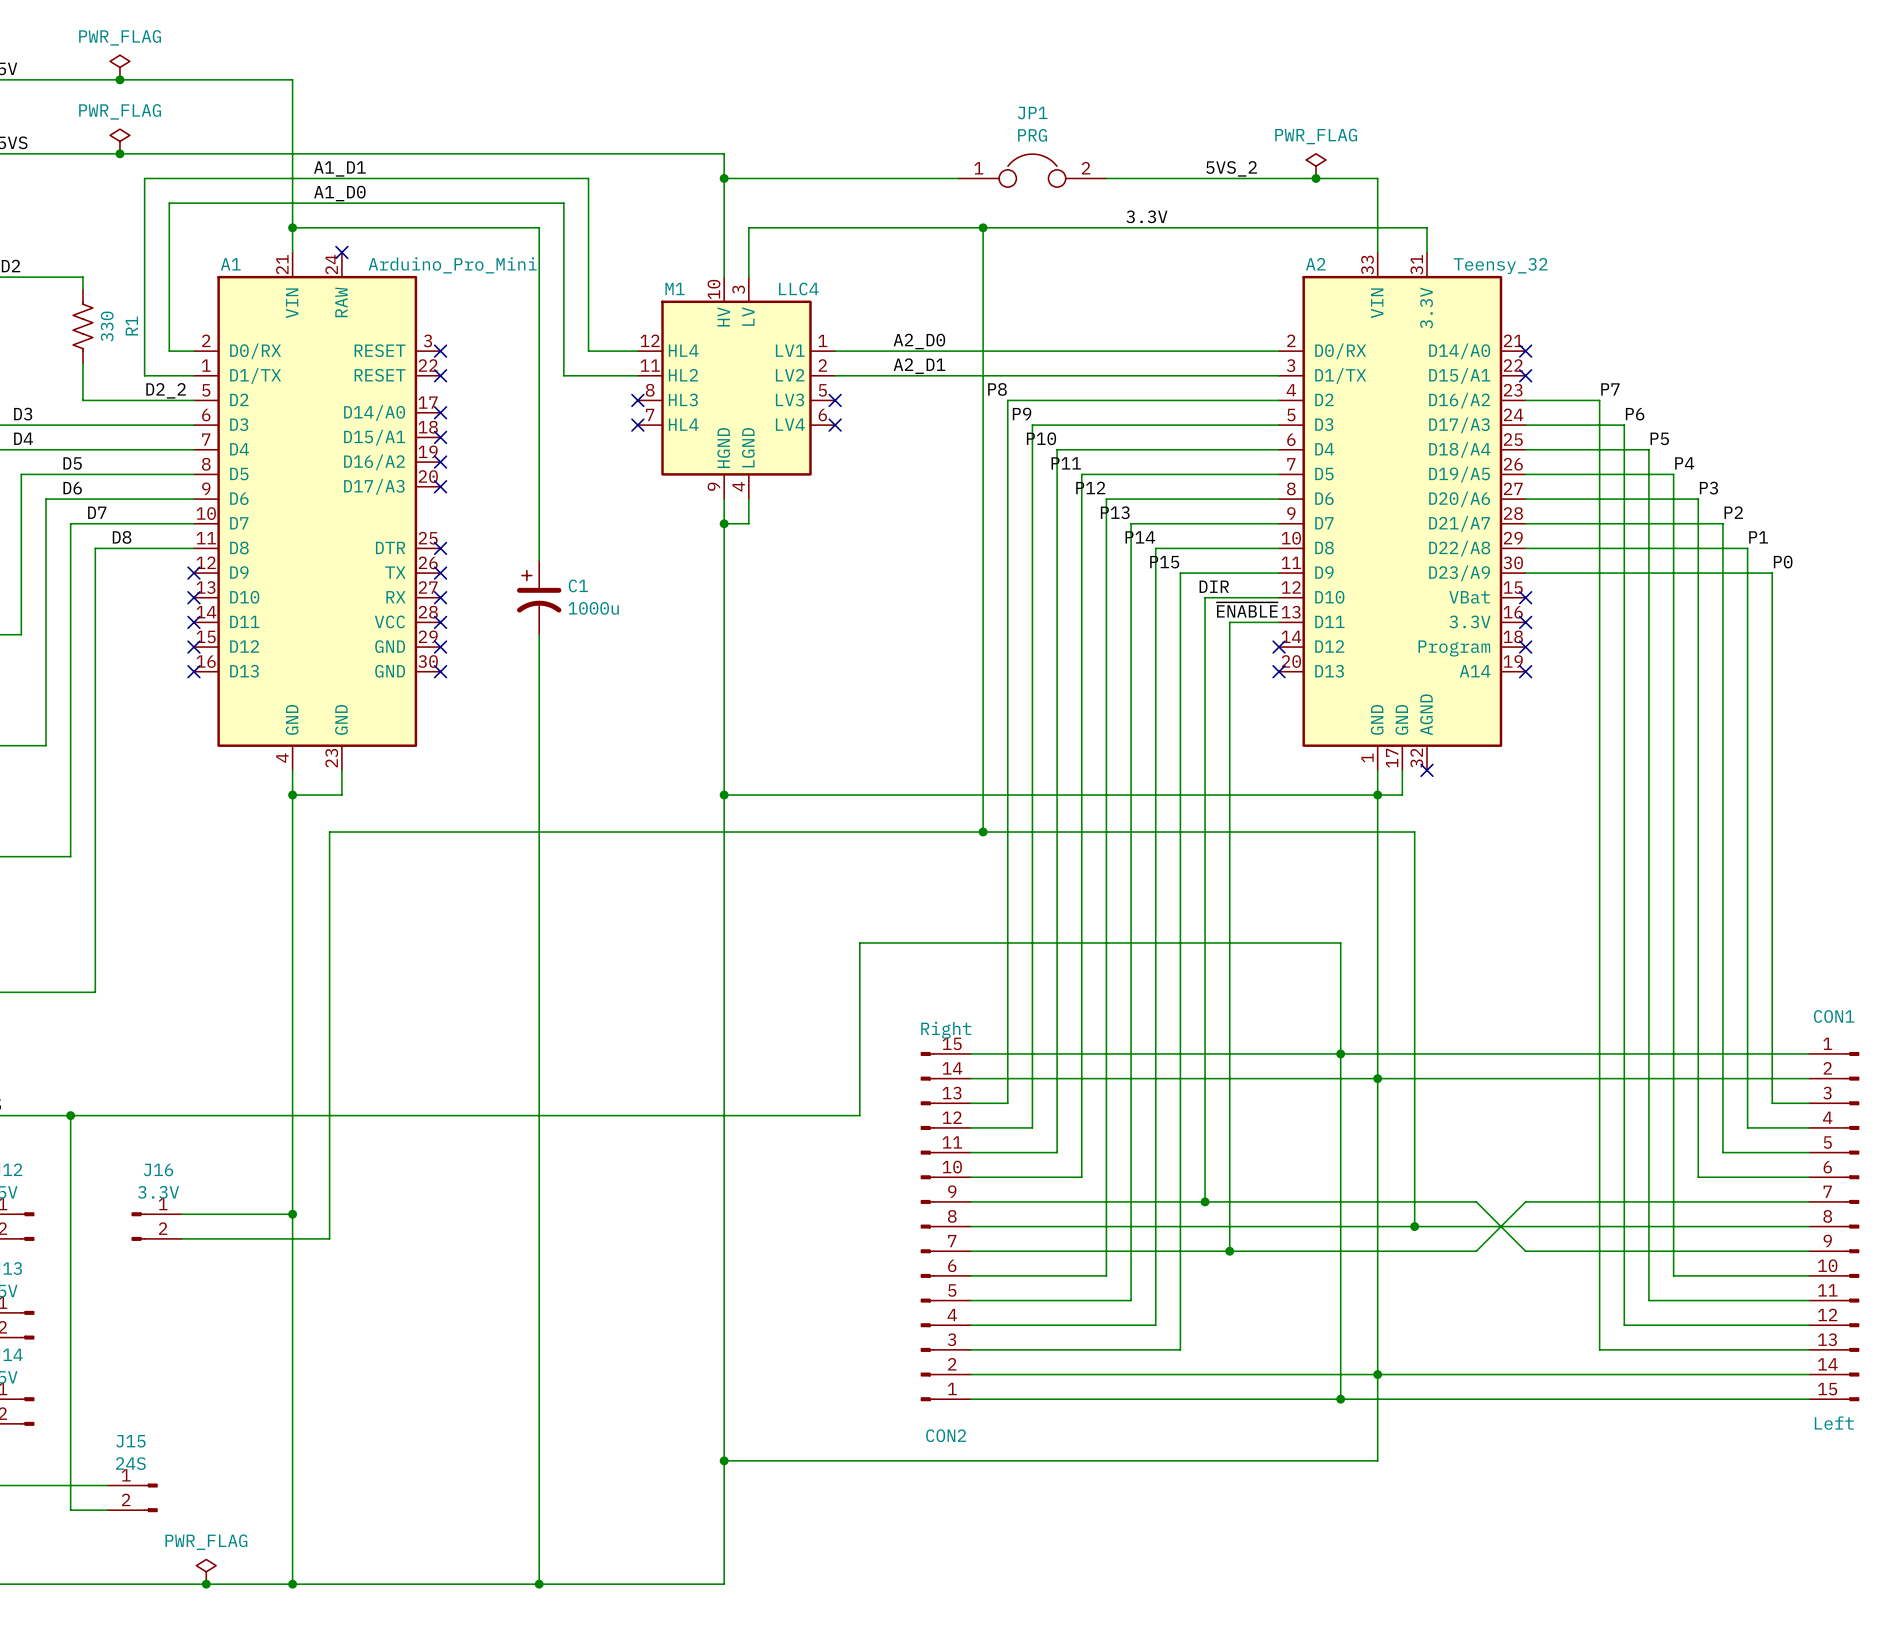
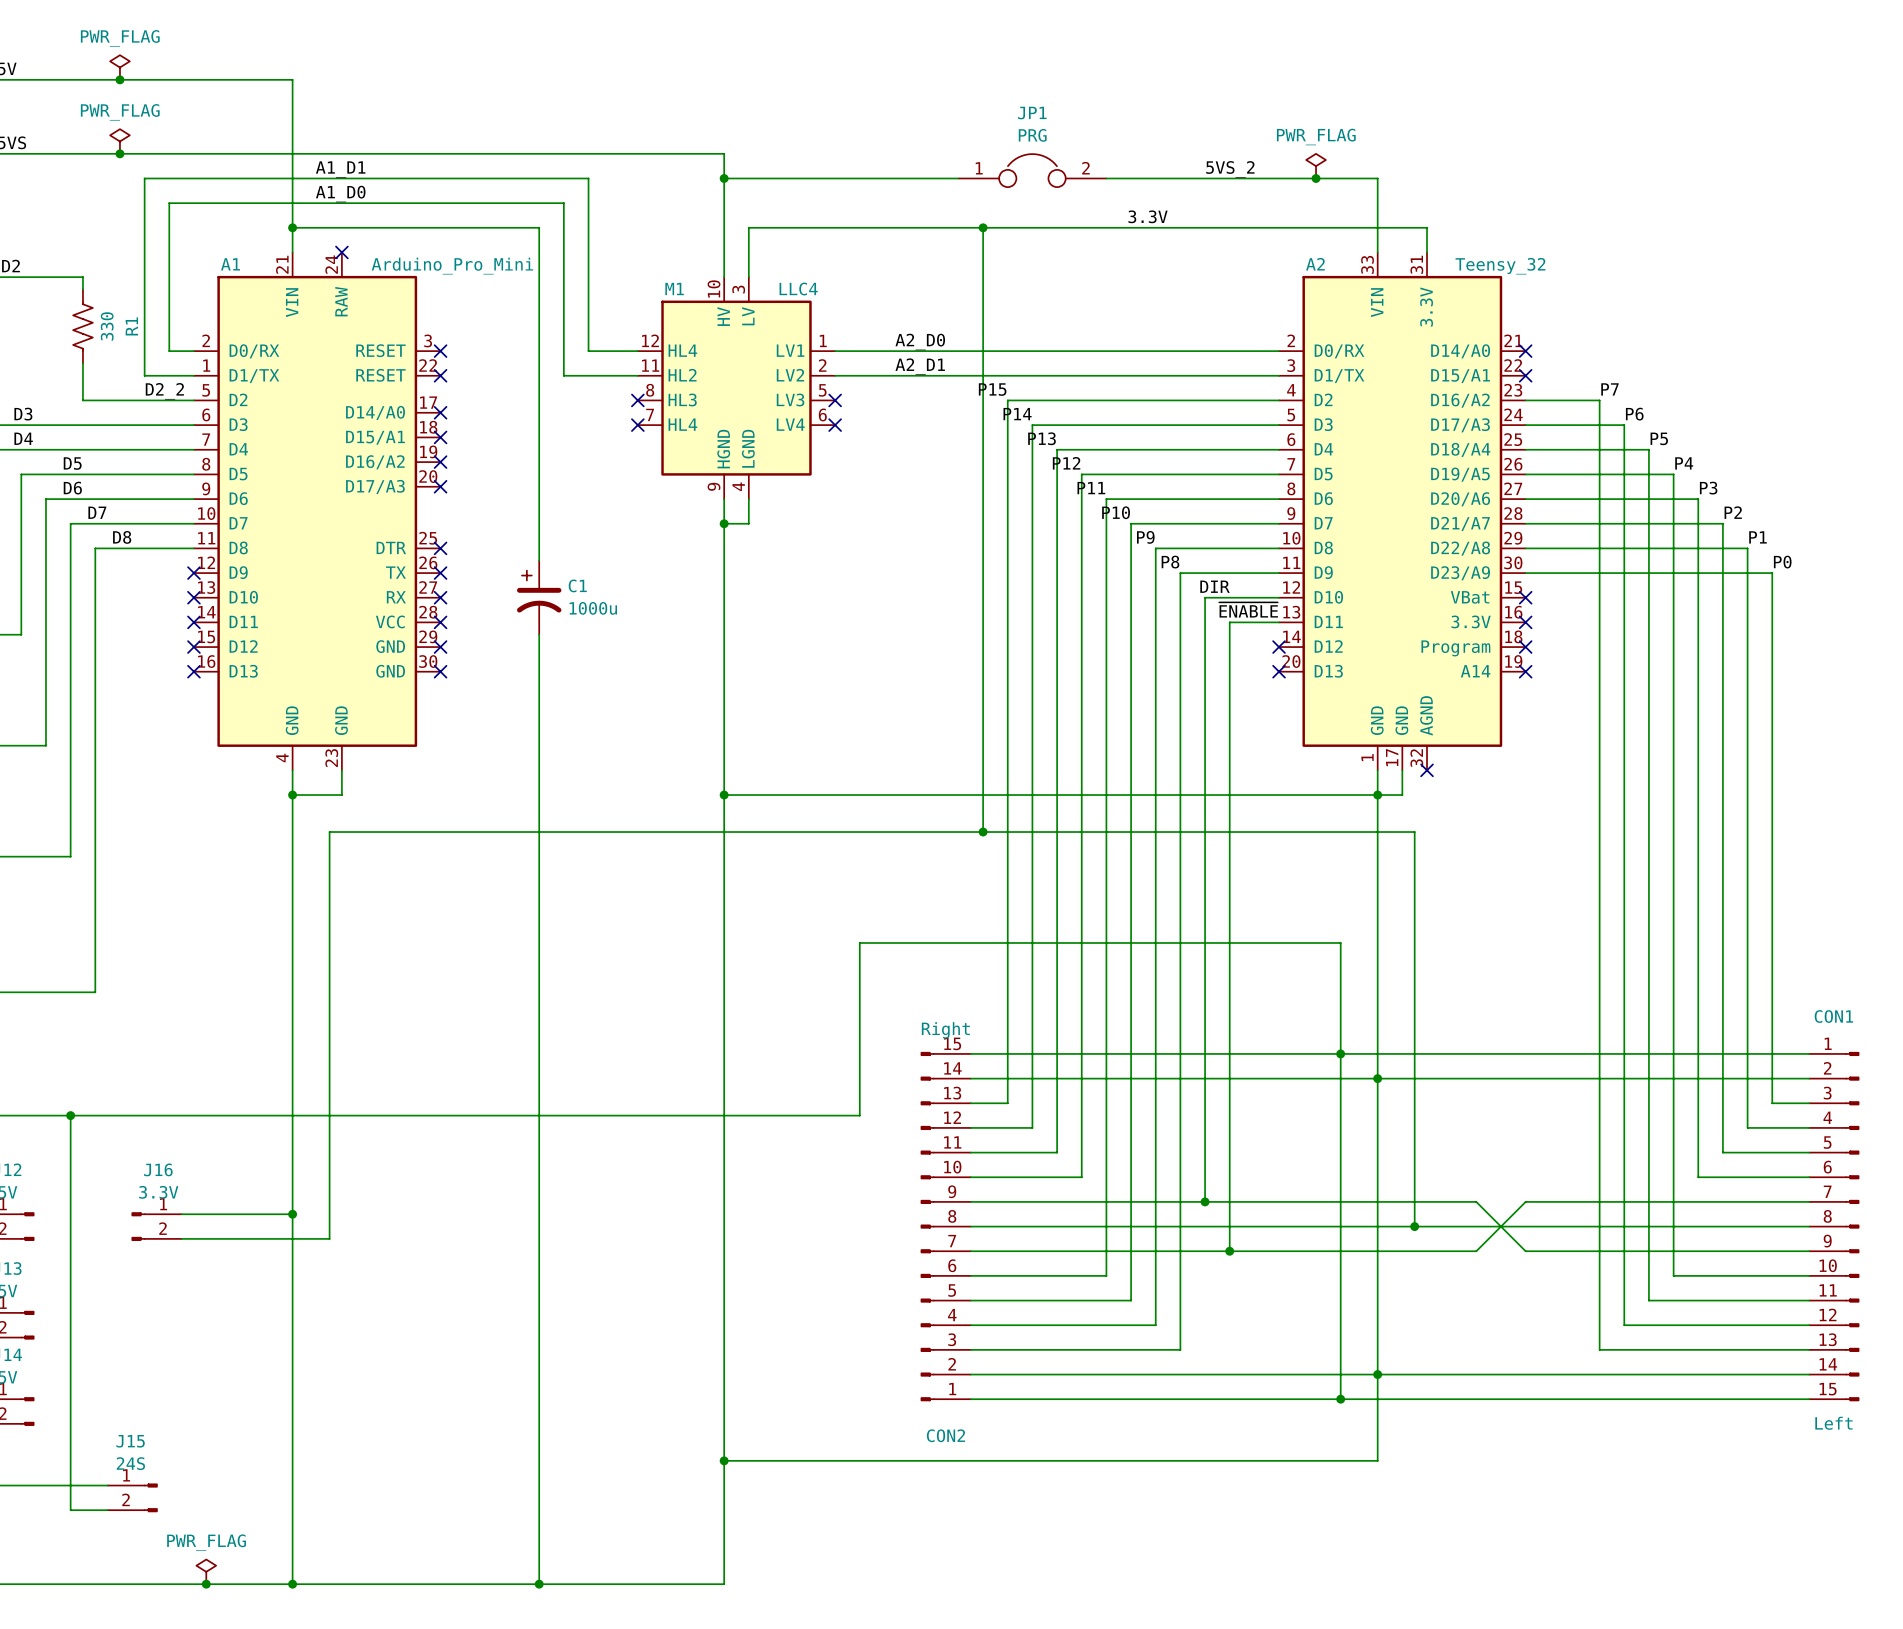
label: P8 (997, 389) -> P15 (992, 389)
label: P9 (1022, 413) -> P14 (1017, 414)
label: P10 (1041, 438) -> P13 (1041, 438)
label: P11 (1066, 463) -> P12 (1066, 463)
label: P12 (1090, 487) -> P11 (1091, 488)
label: P13 (1115, 512) -> P10 (1116, 512)
label: P14 (1140, 537) -> P9 (1145, 537)
label: P15 (1164, 562) -> P8 (1170, 562)

